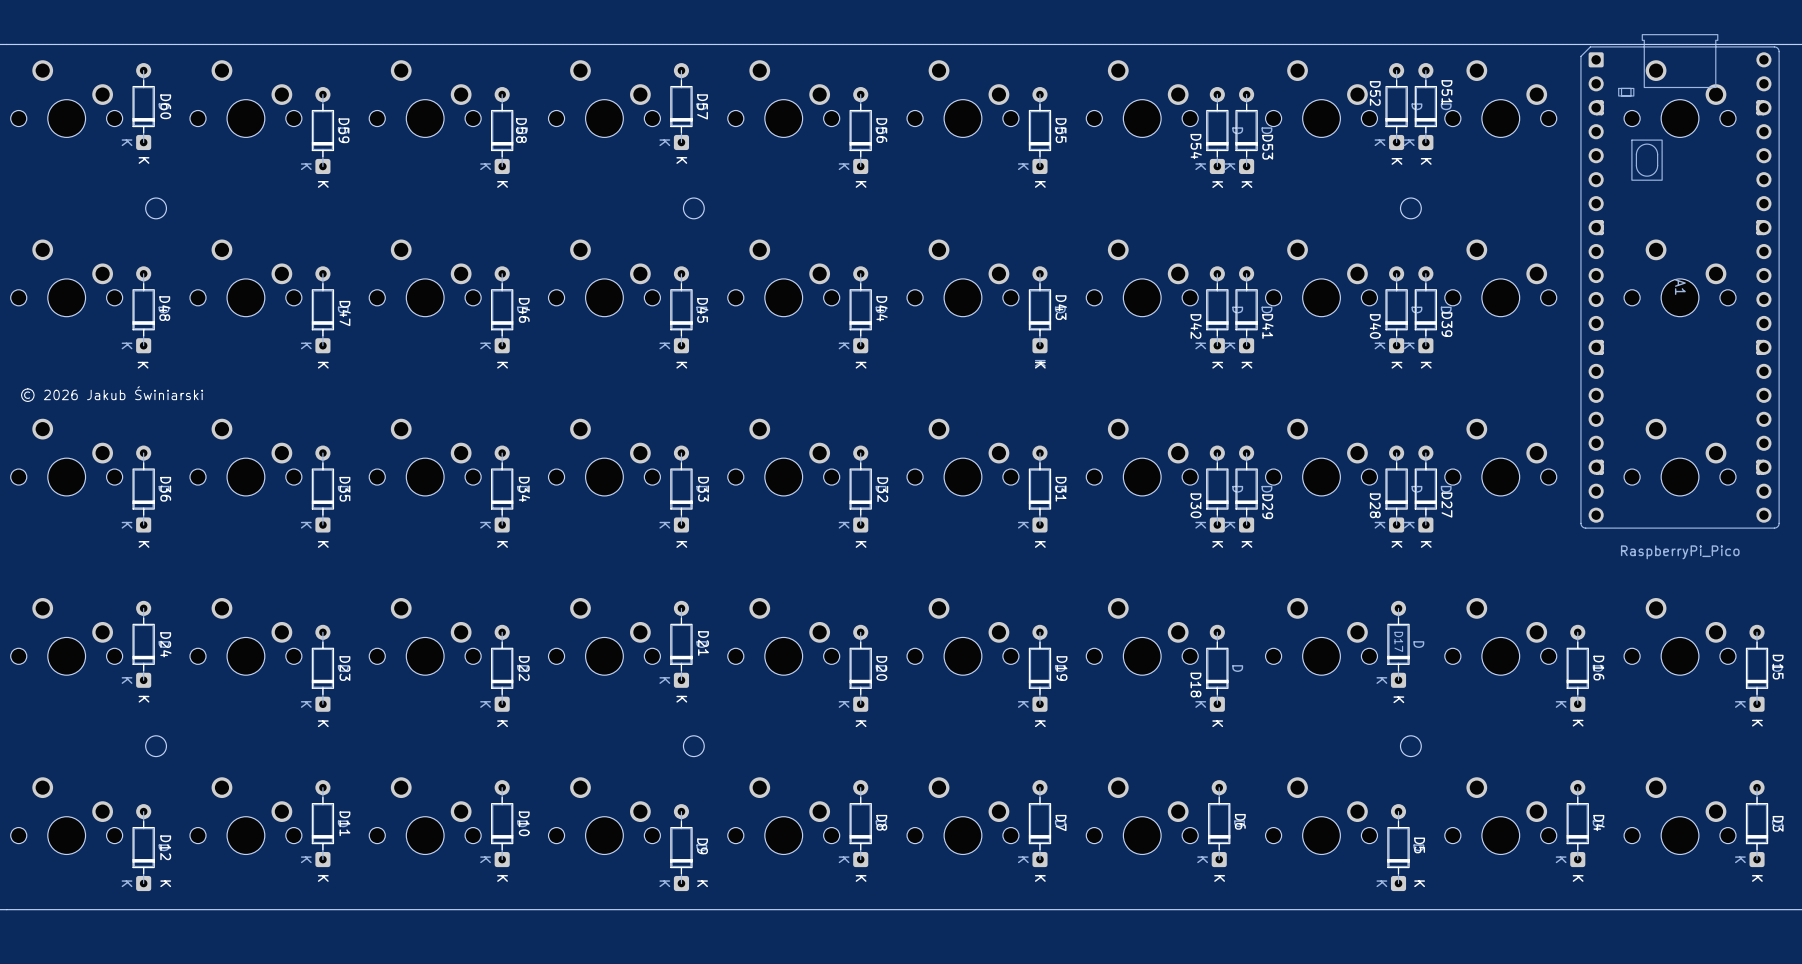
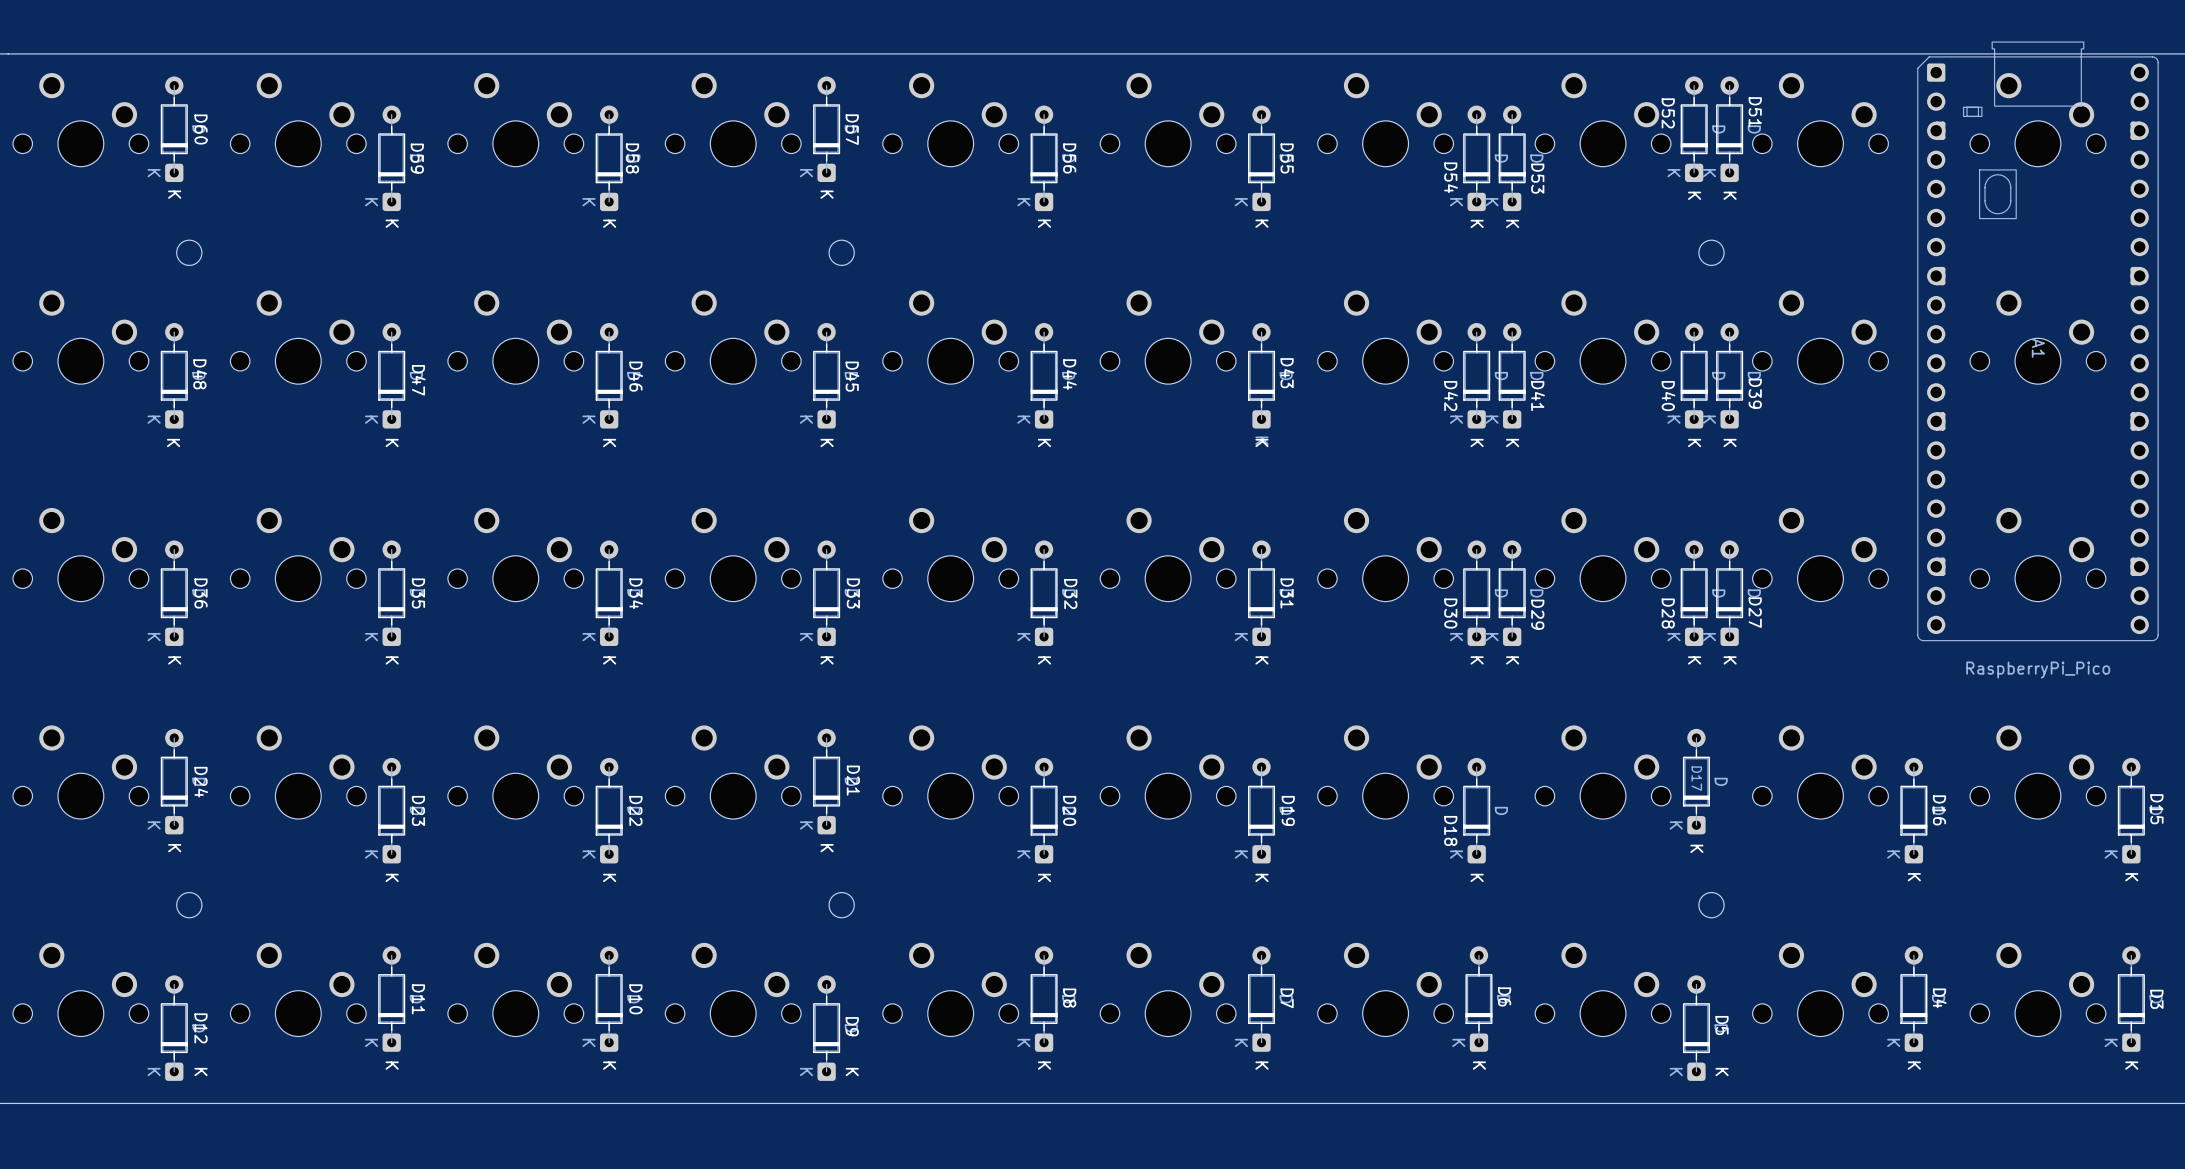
text: © 2026 Jakub Świniarski (112, 394) -> none

